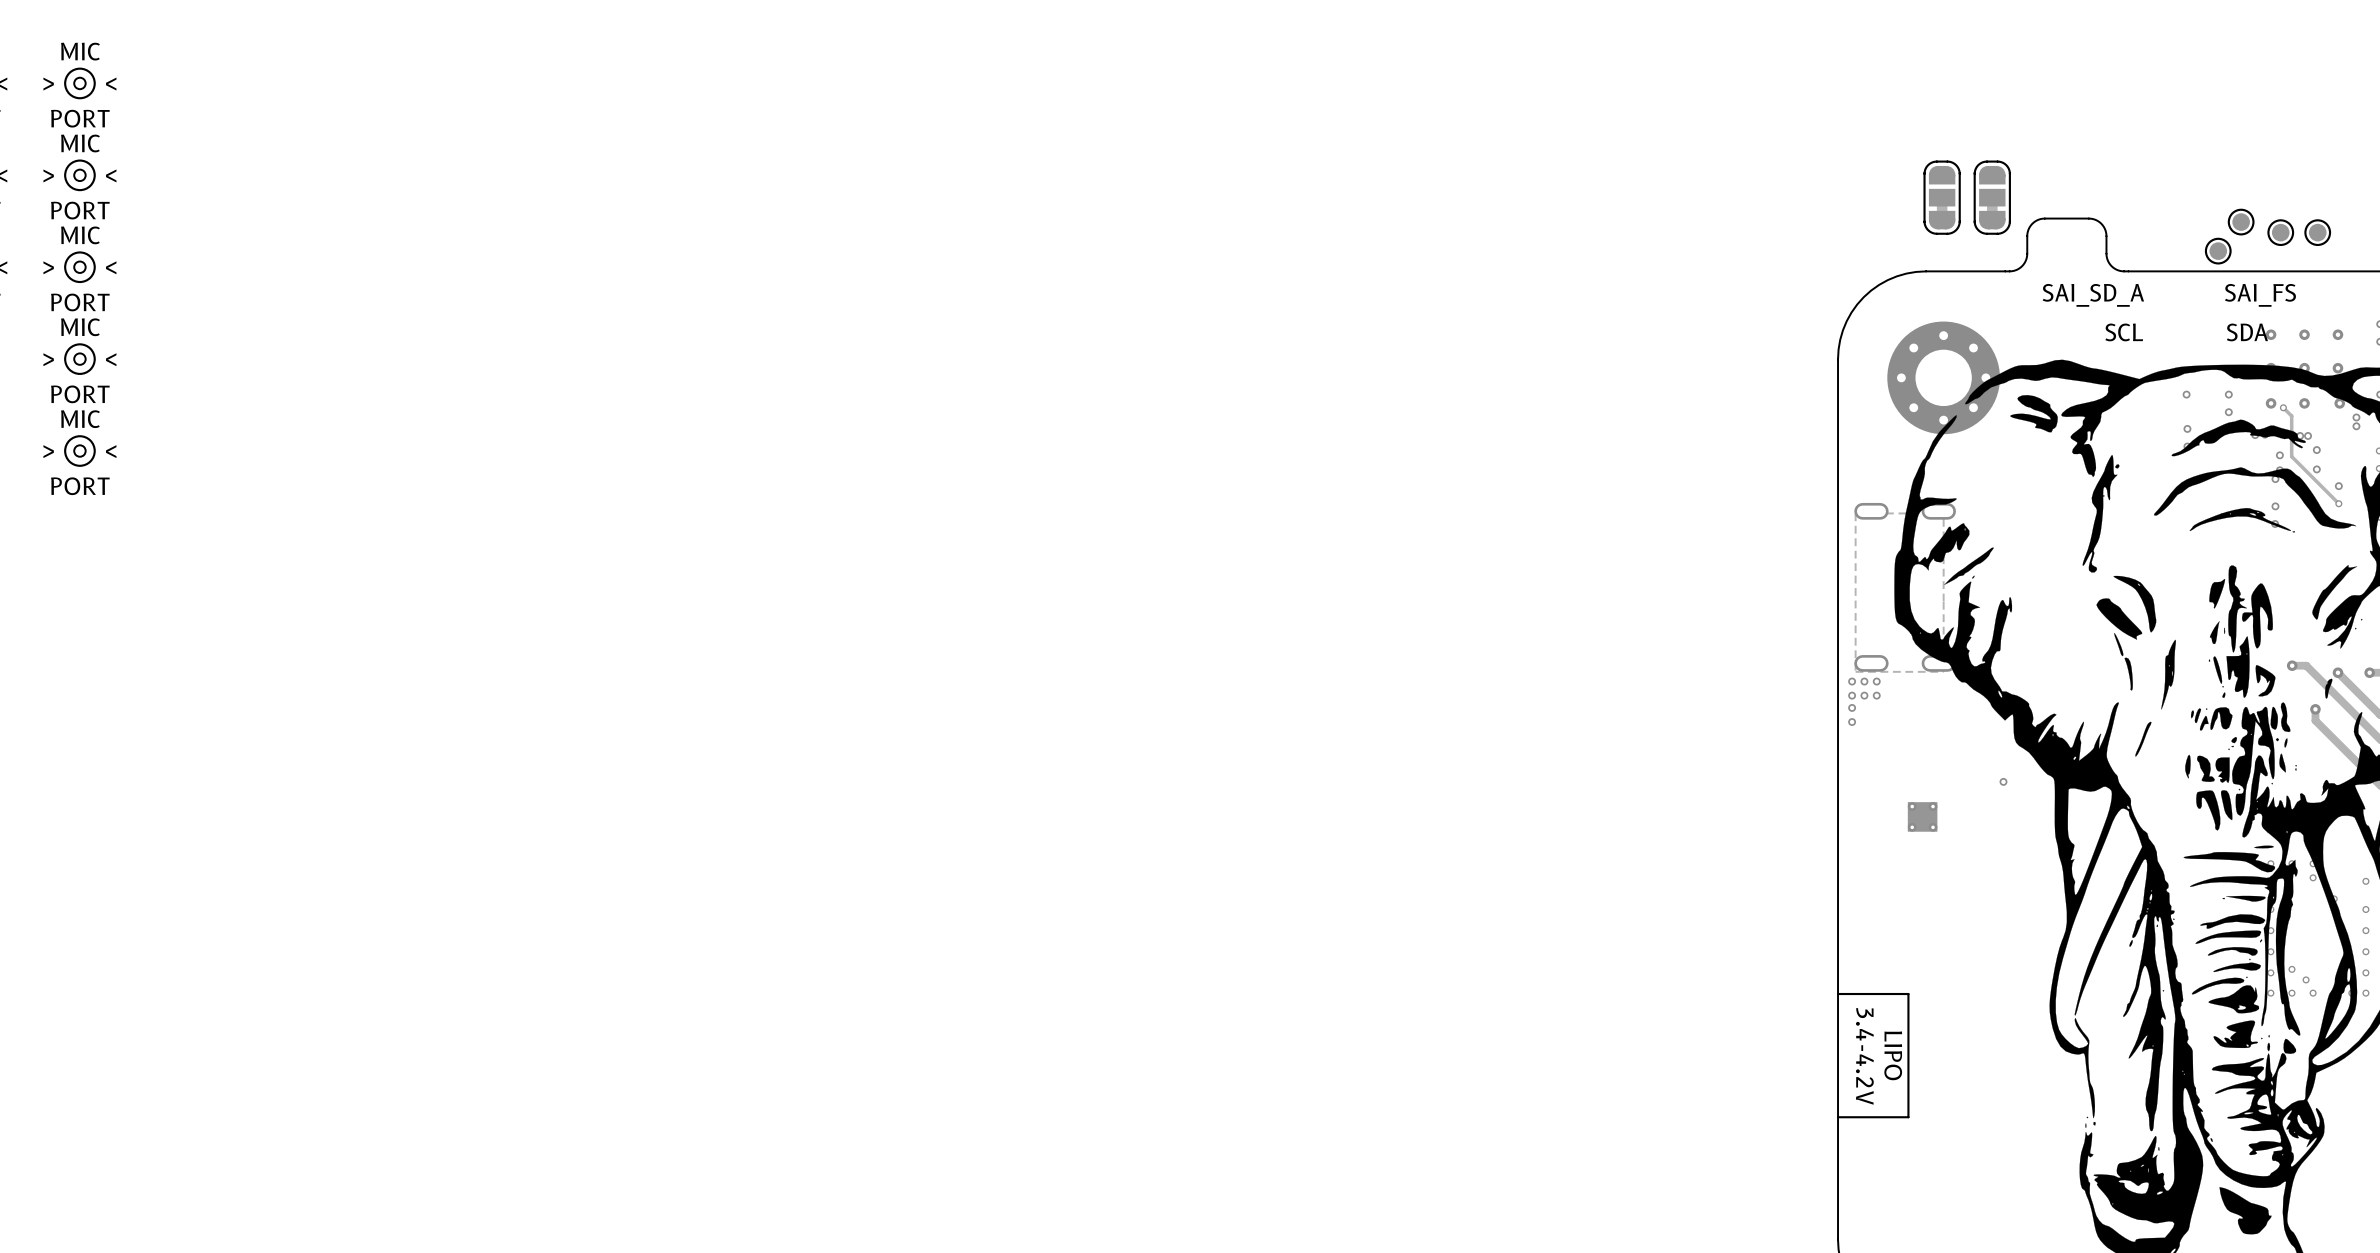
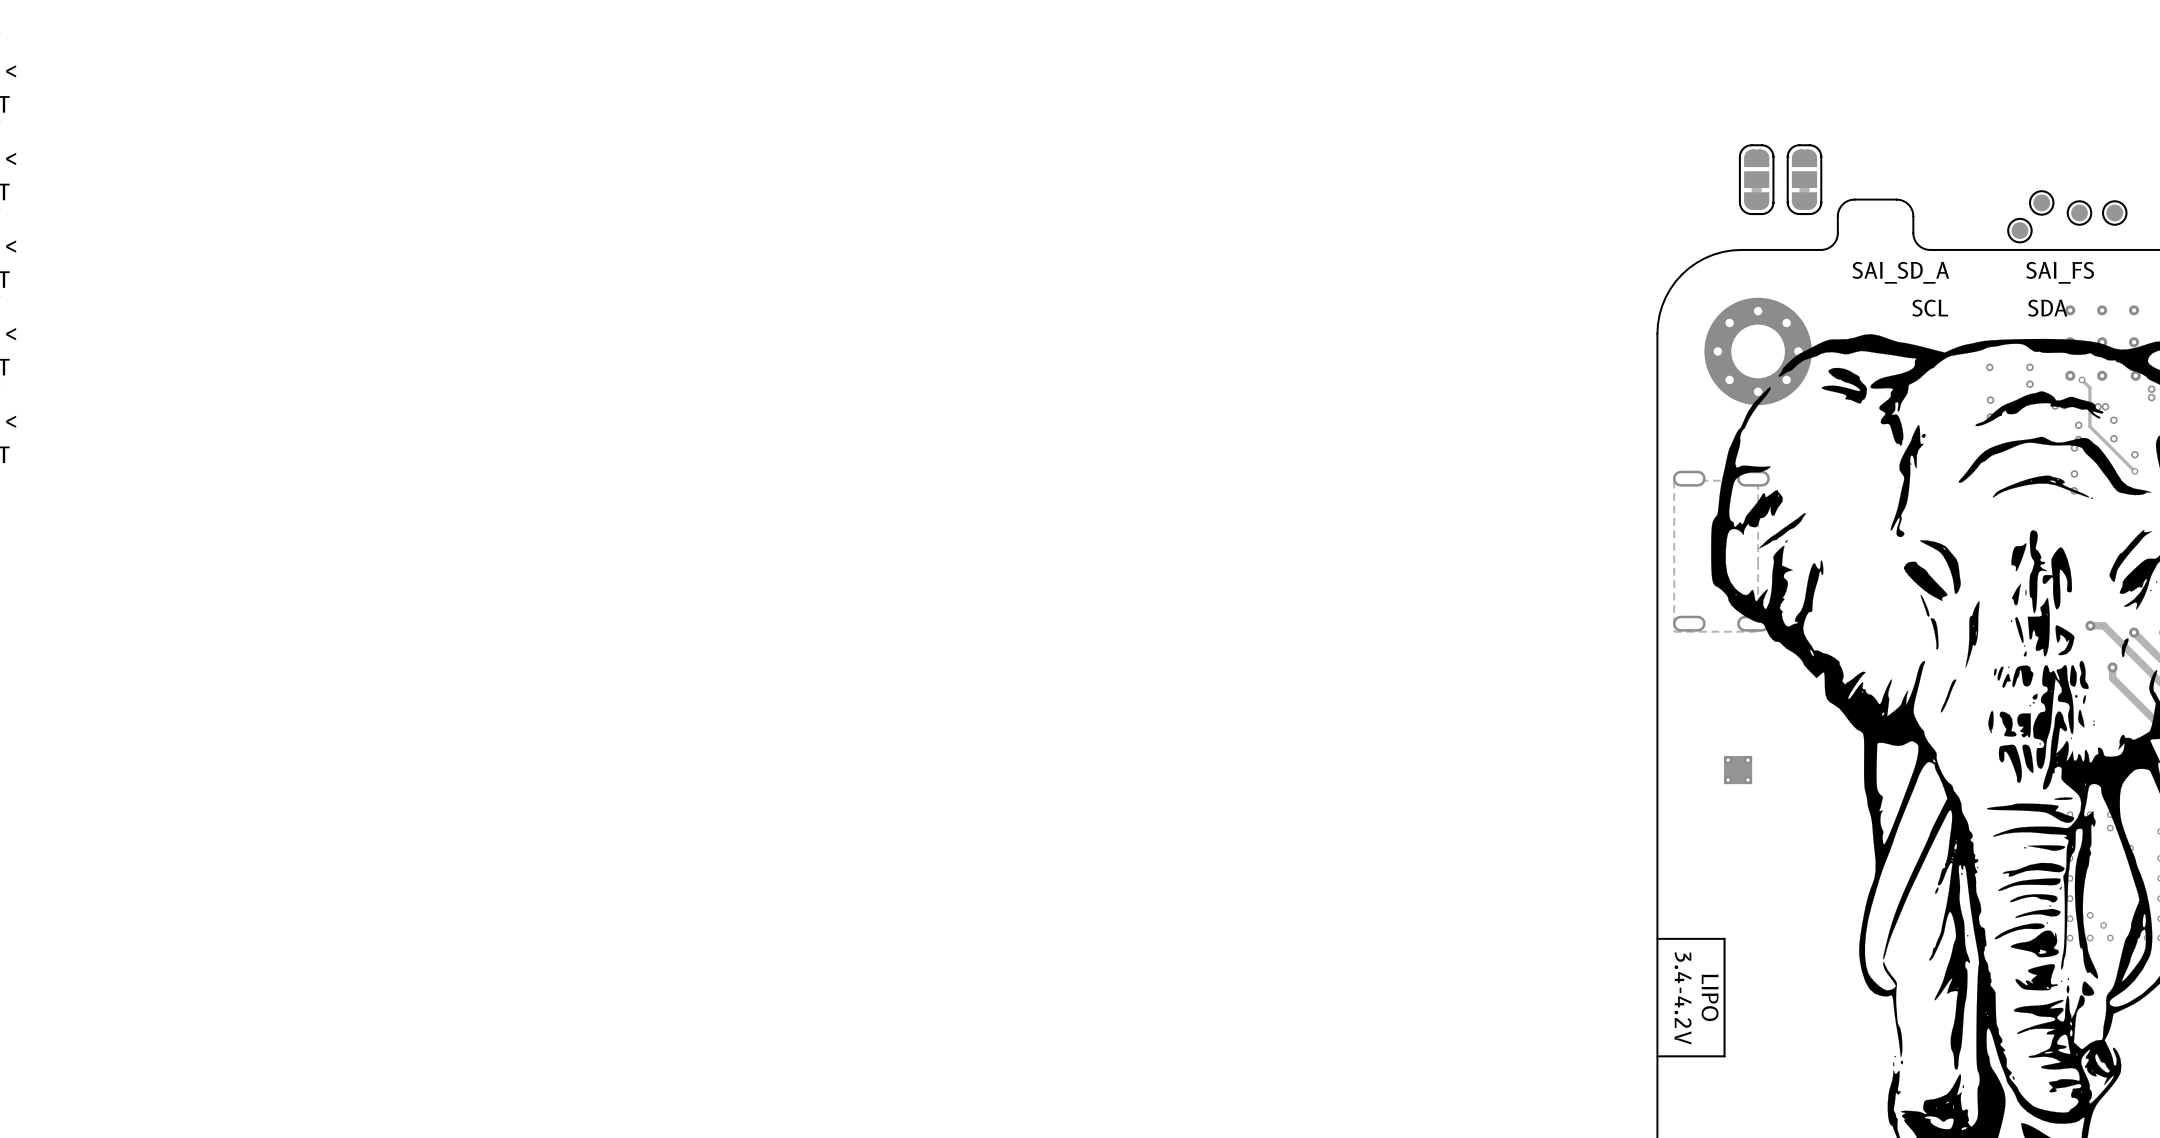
via: (1852, 681) -> none
via: (1864, 681) -> none
via: (1876, 681) -> none
via: (1852, 695) -> none
via: (1864, 695) -> none
via: (1876, 695) -> none
via: (1852, 707) -> none
via: (1852, 722) -> none
via: (2003, 781) -> none

